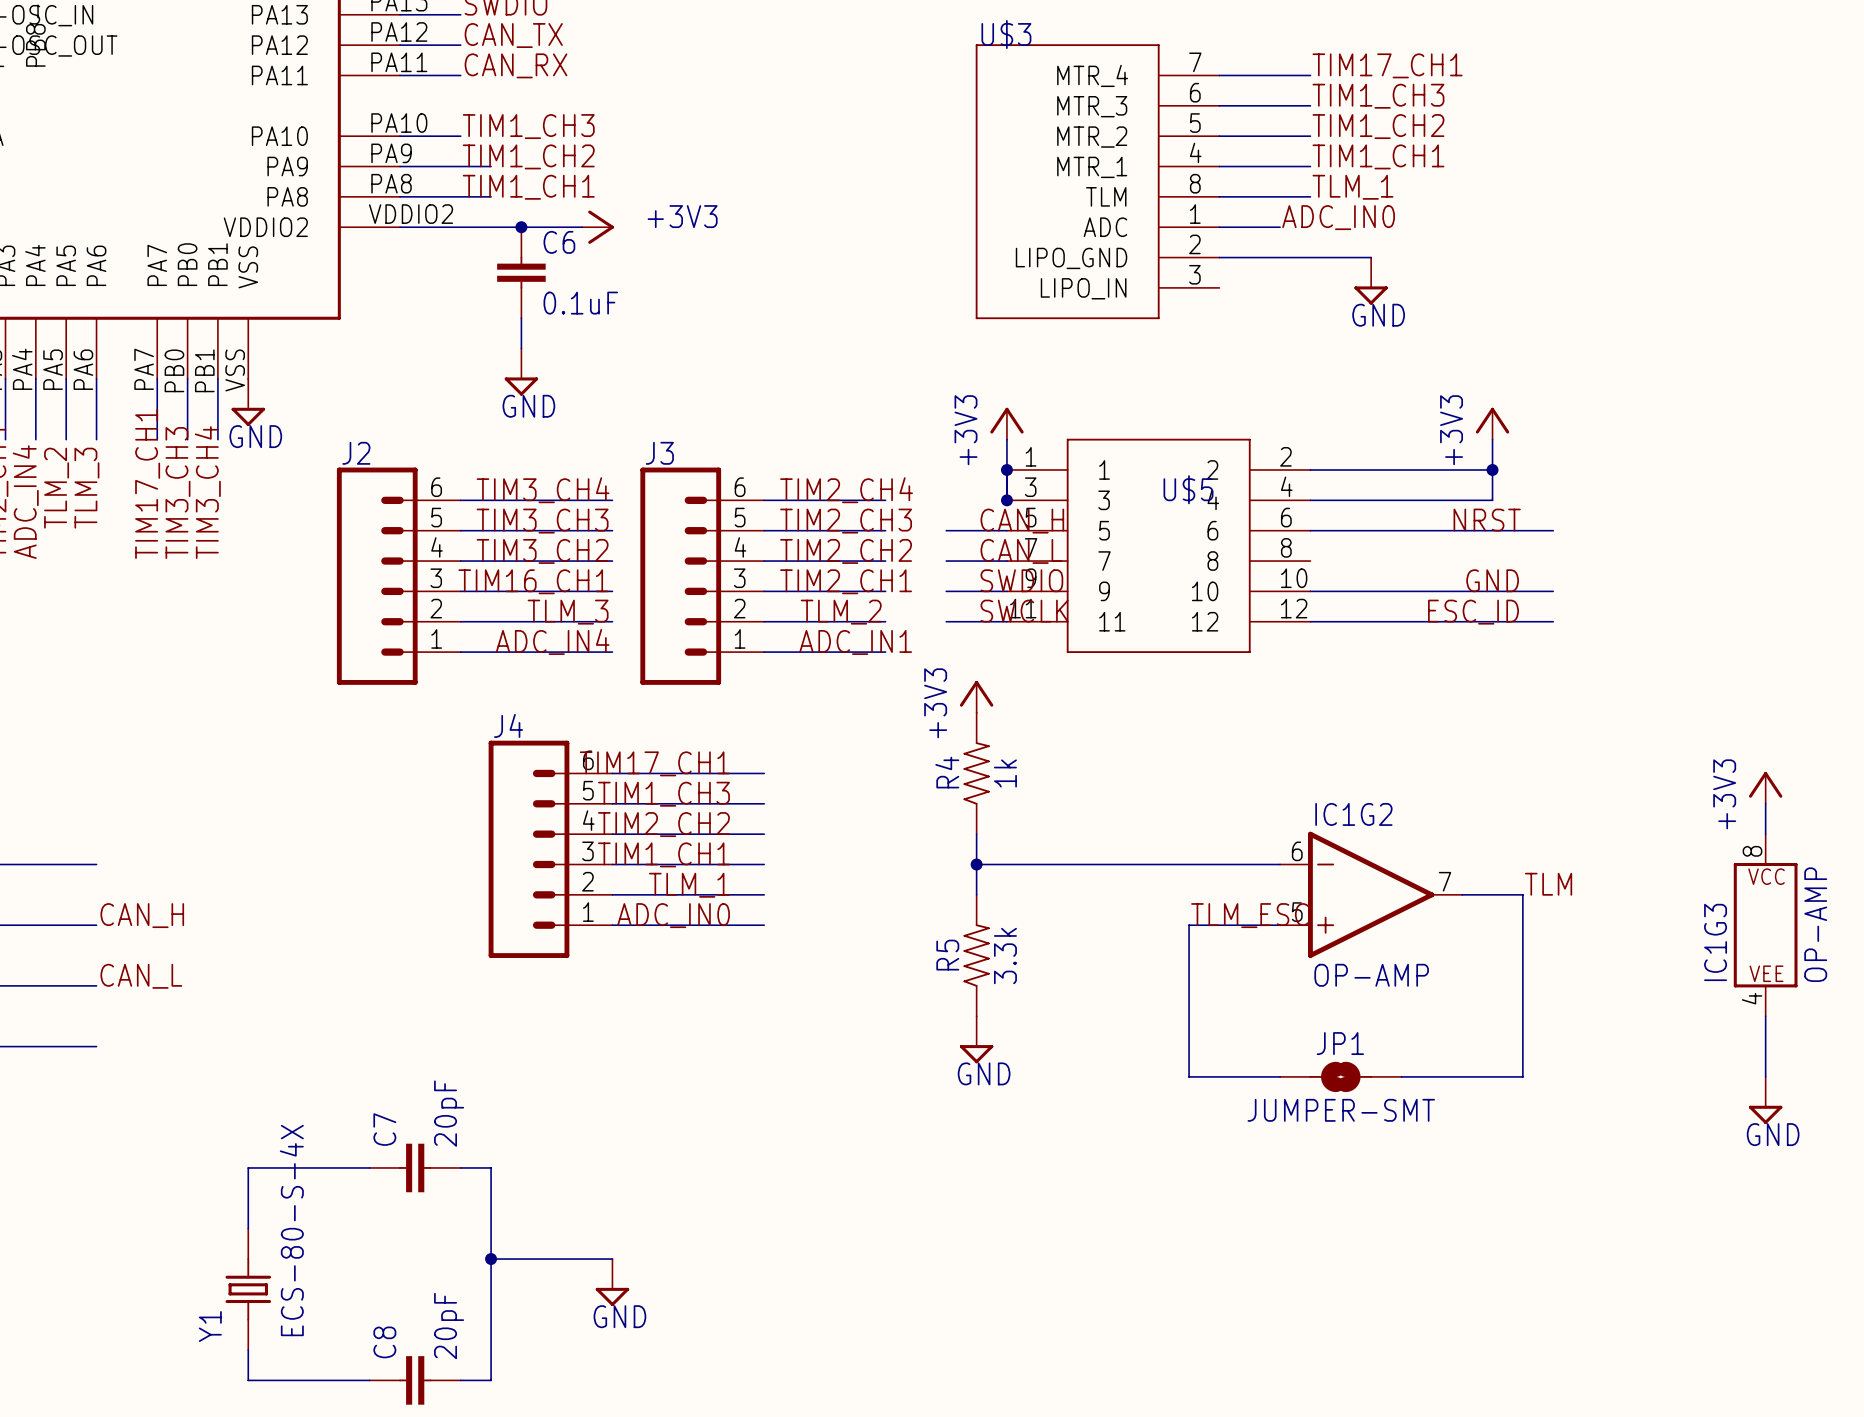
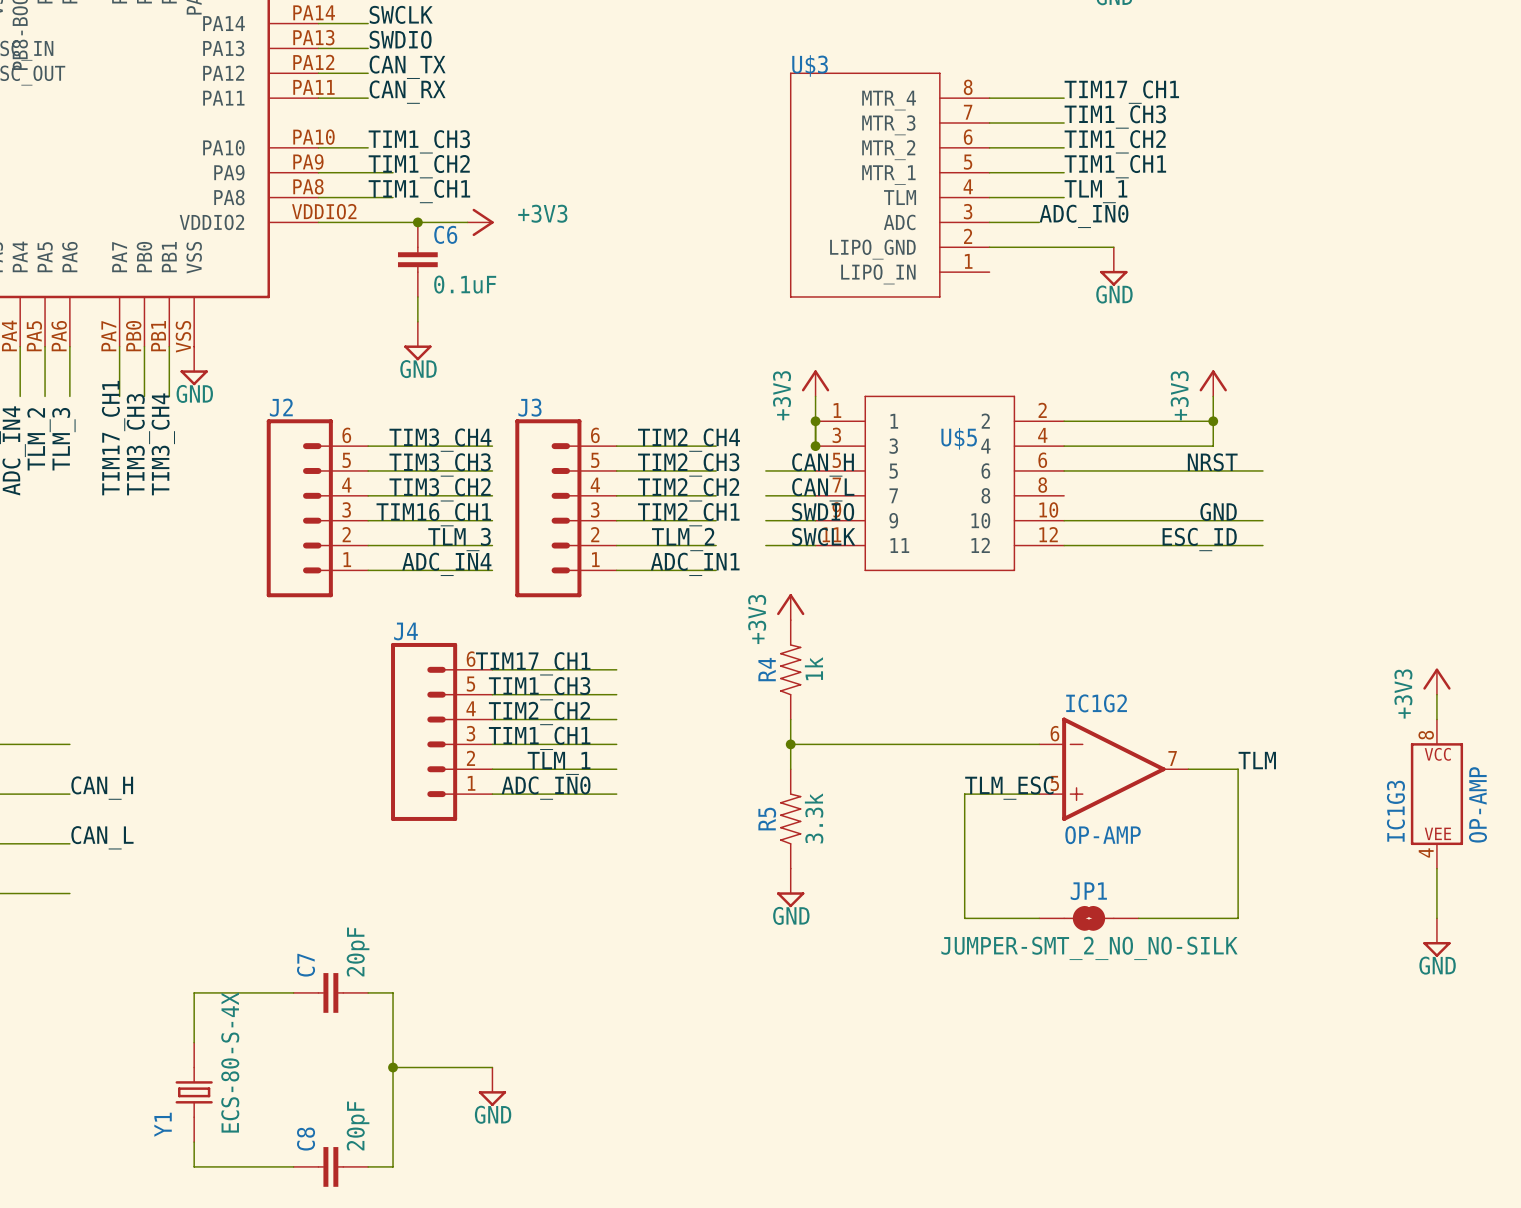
U$3 pin number: 7 (1195, 62) -> 8 (968, 87)
U$3 pin number: 6 (1195, 92) -> 7 (968, 112)
U$3 pin number: 5 (1195, 123) -> 6 (968, 137)
U$3 pin number: 4 (1195, 152) -> 5 (968, 162)
U$3 pin number: 8 (1195, 183) -> 4 (968, 186)
U$3 pin number: 1 (1195, 214) -> 3 (968, 211)
U$3 pin number: 3 (1194, 274) -> 1 (968, 261)
JP1 value: JUMPER-SMT (1341, 1110) -> JUMPER-SMT_2_NO_NO-SILK (1089, 948)

